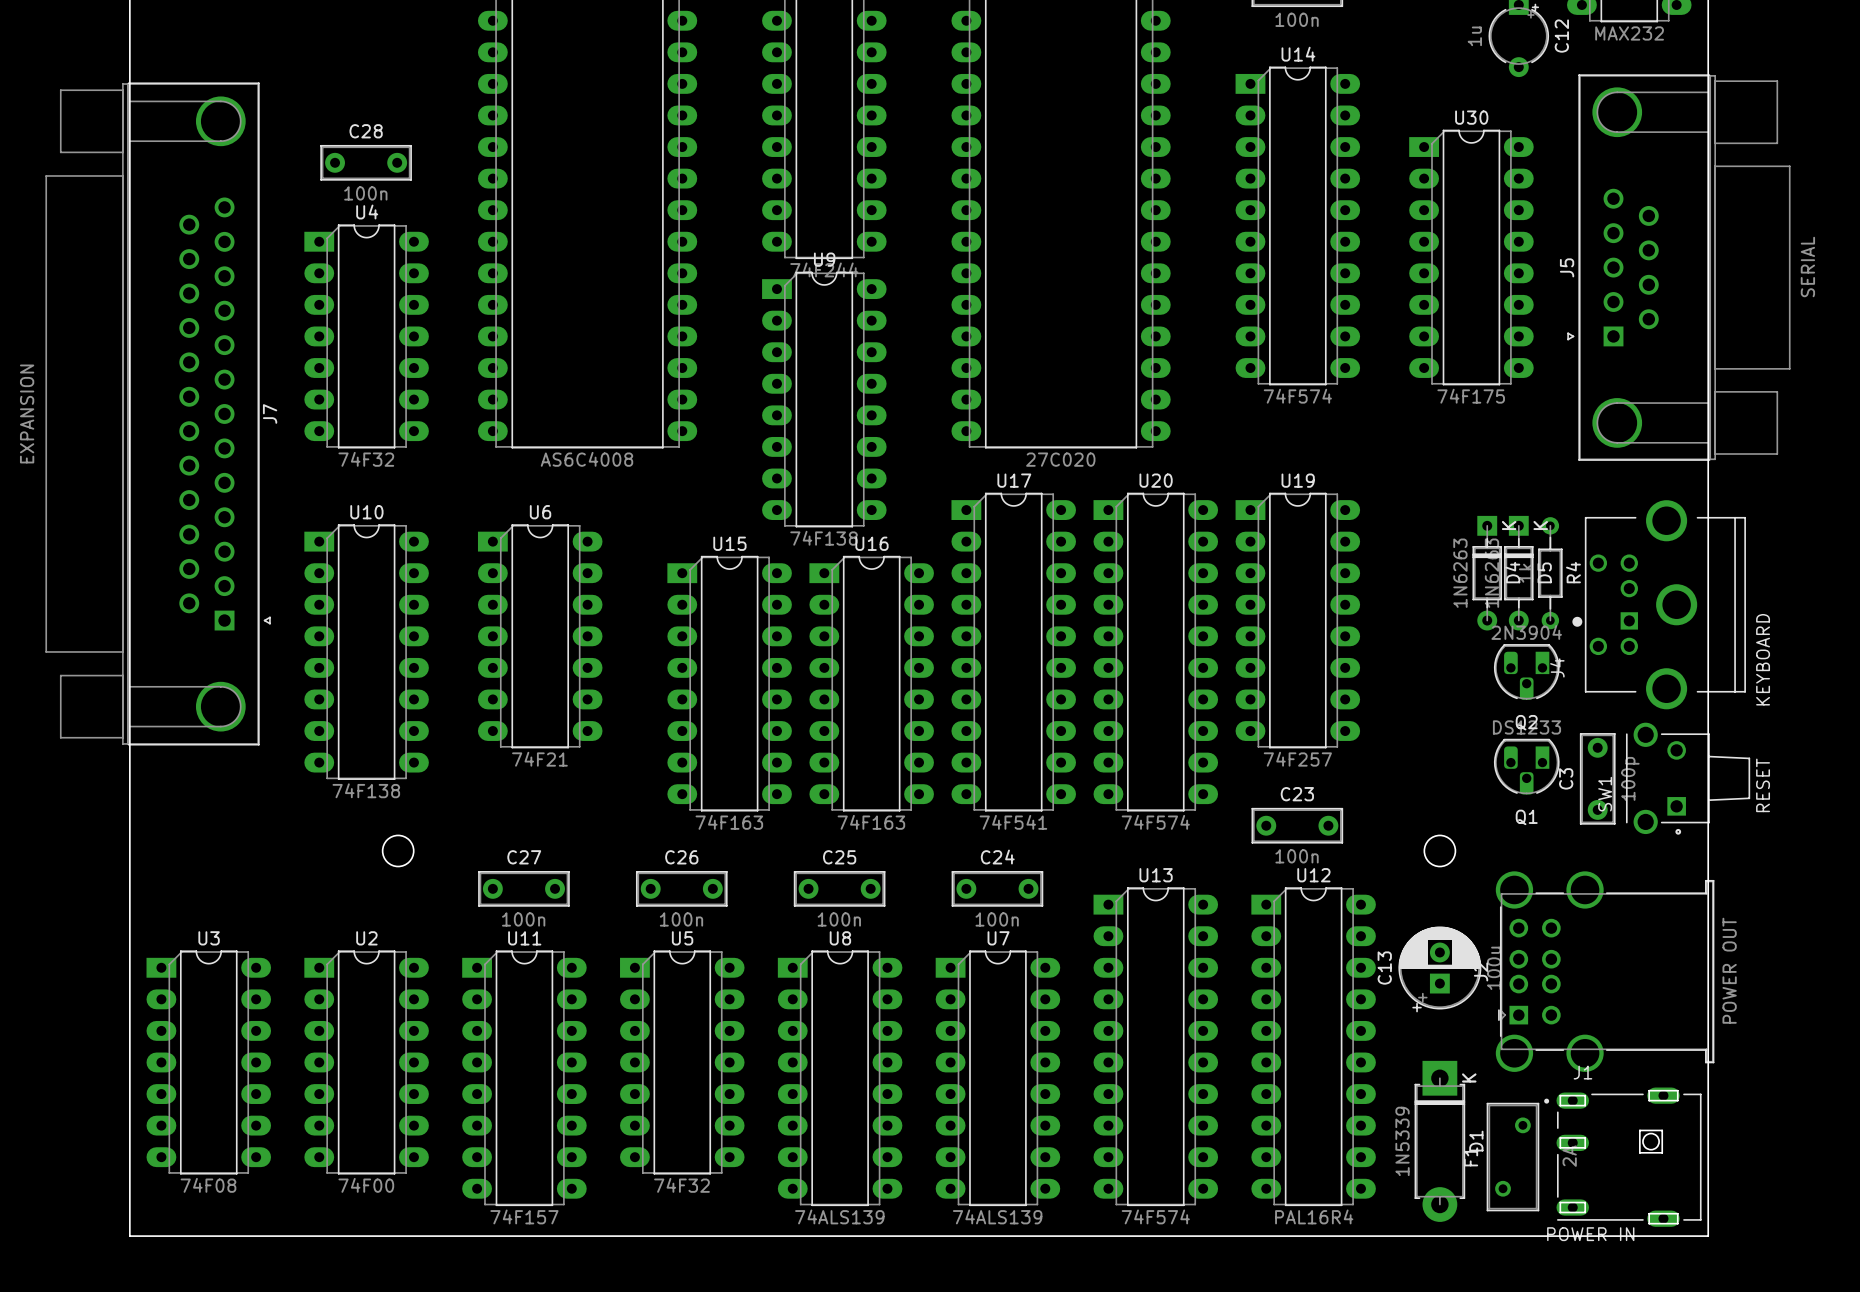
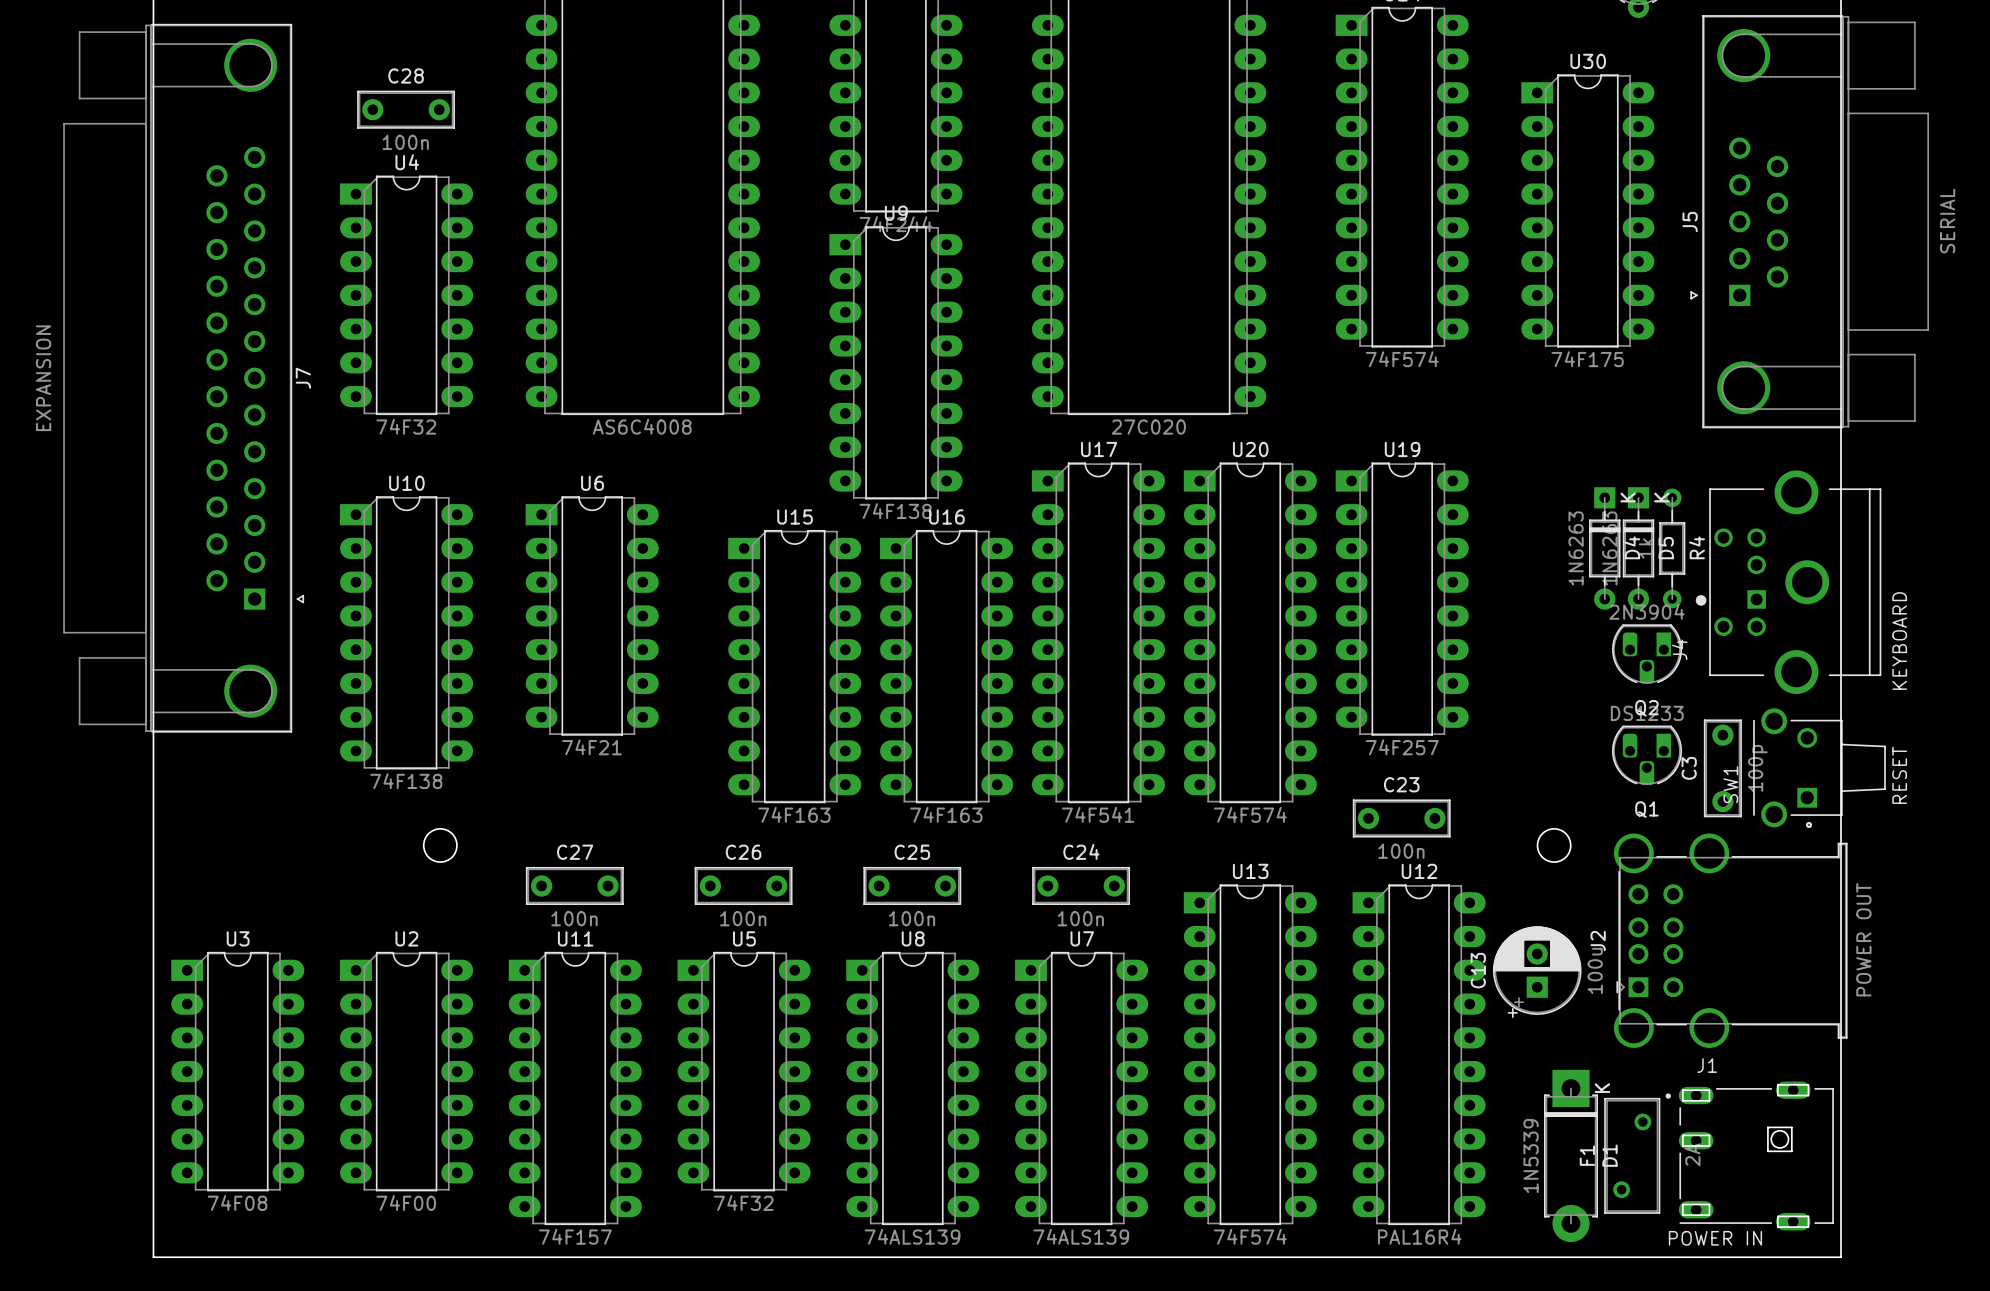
C13 position: (1439, 969) -> (1537, 972)
J2 position: (1605, 971) -> (1730, 940)
D1 position: (1439, 1141) -> (1571, 1155)
F1 position: (1512, 1157) -> (1632, 1155)
J1 position: (1622, 1157) -> (1749, 1155)

